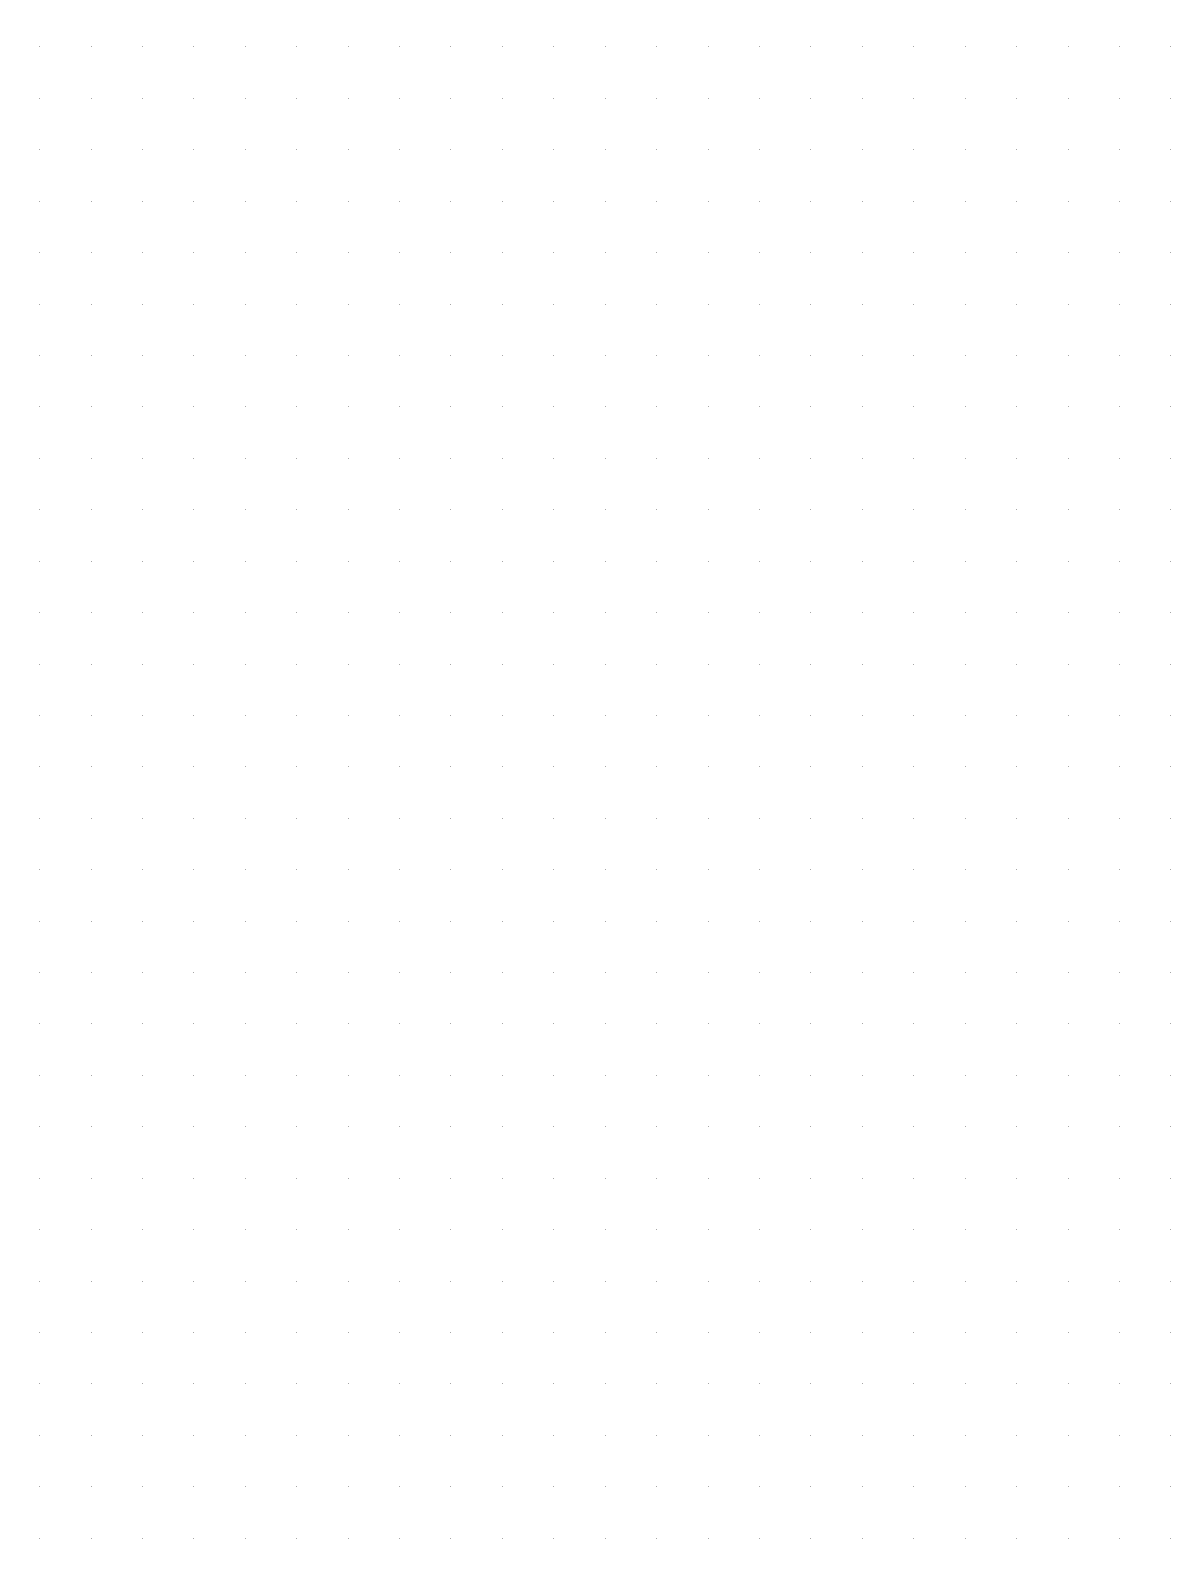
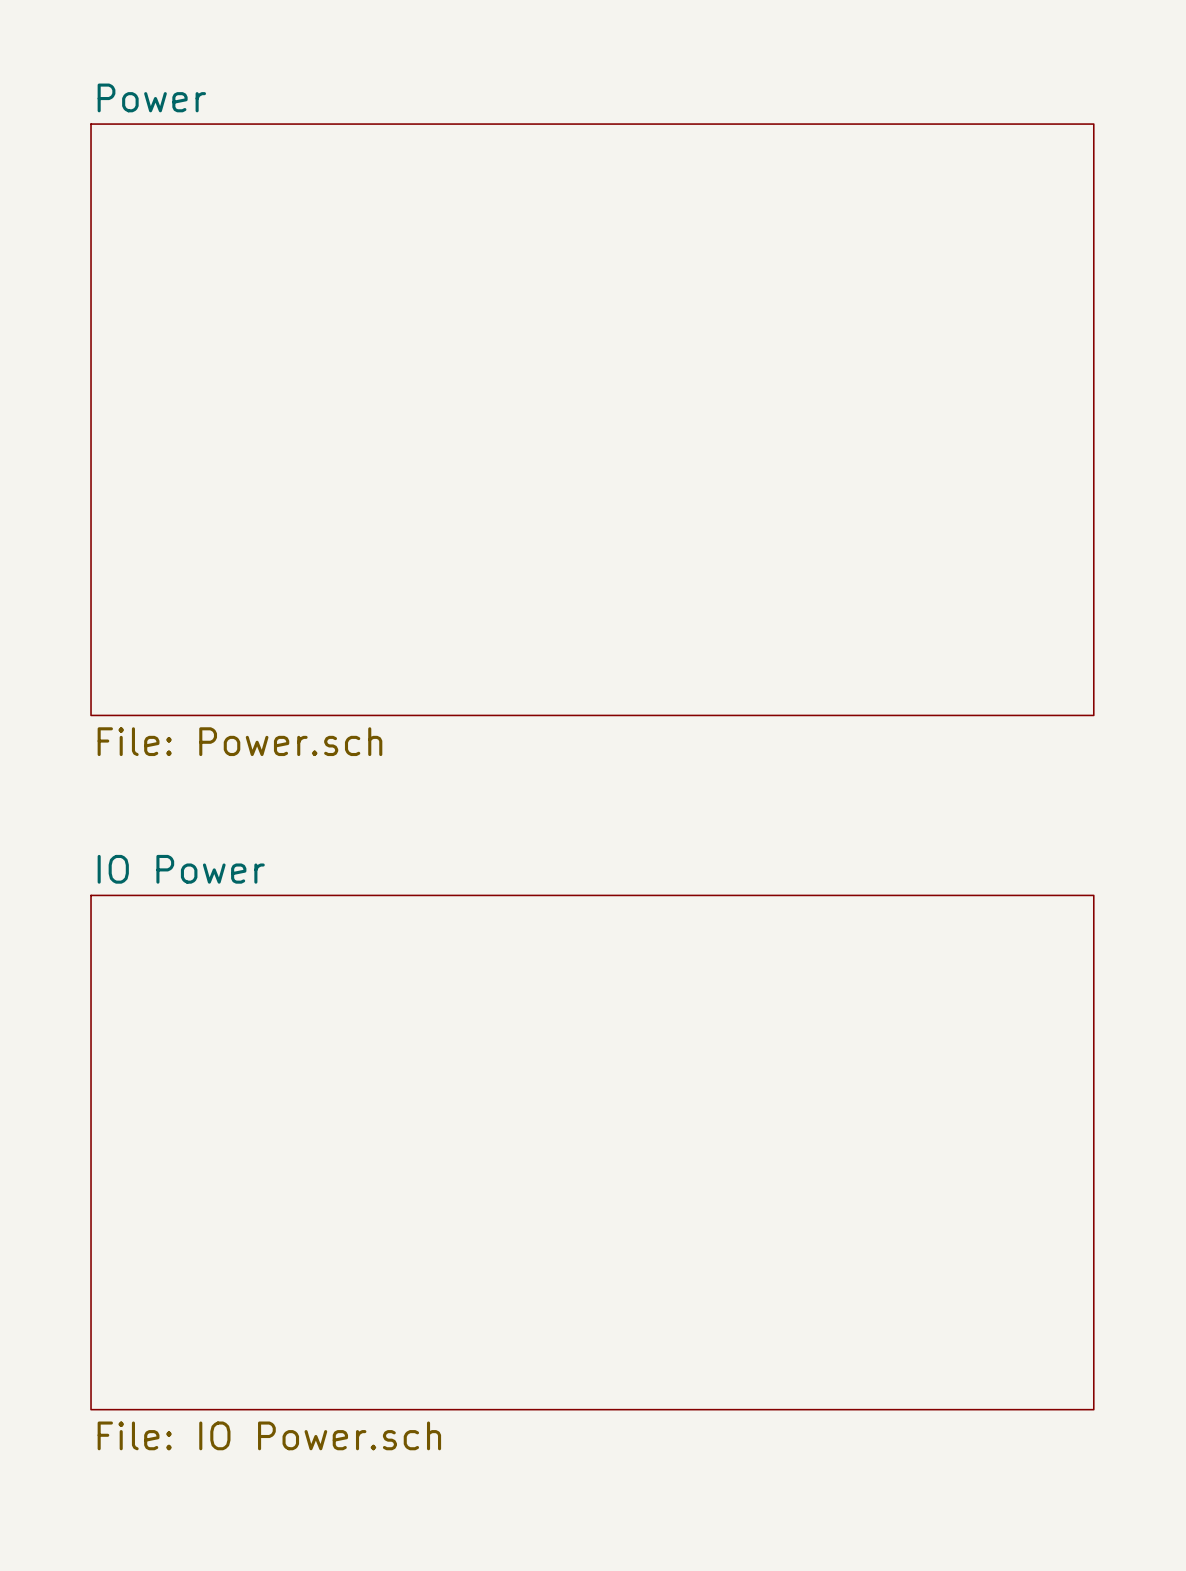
sheet Power: none -> File: Power.sch (592, 419)
sheet IO Power: none -> File: IO Power.sch (592, 1152)

